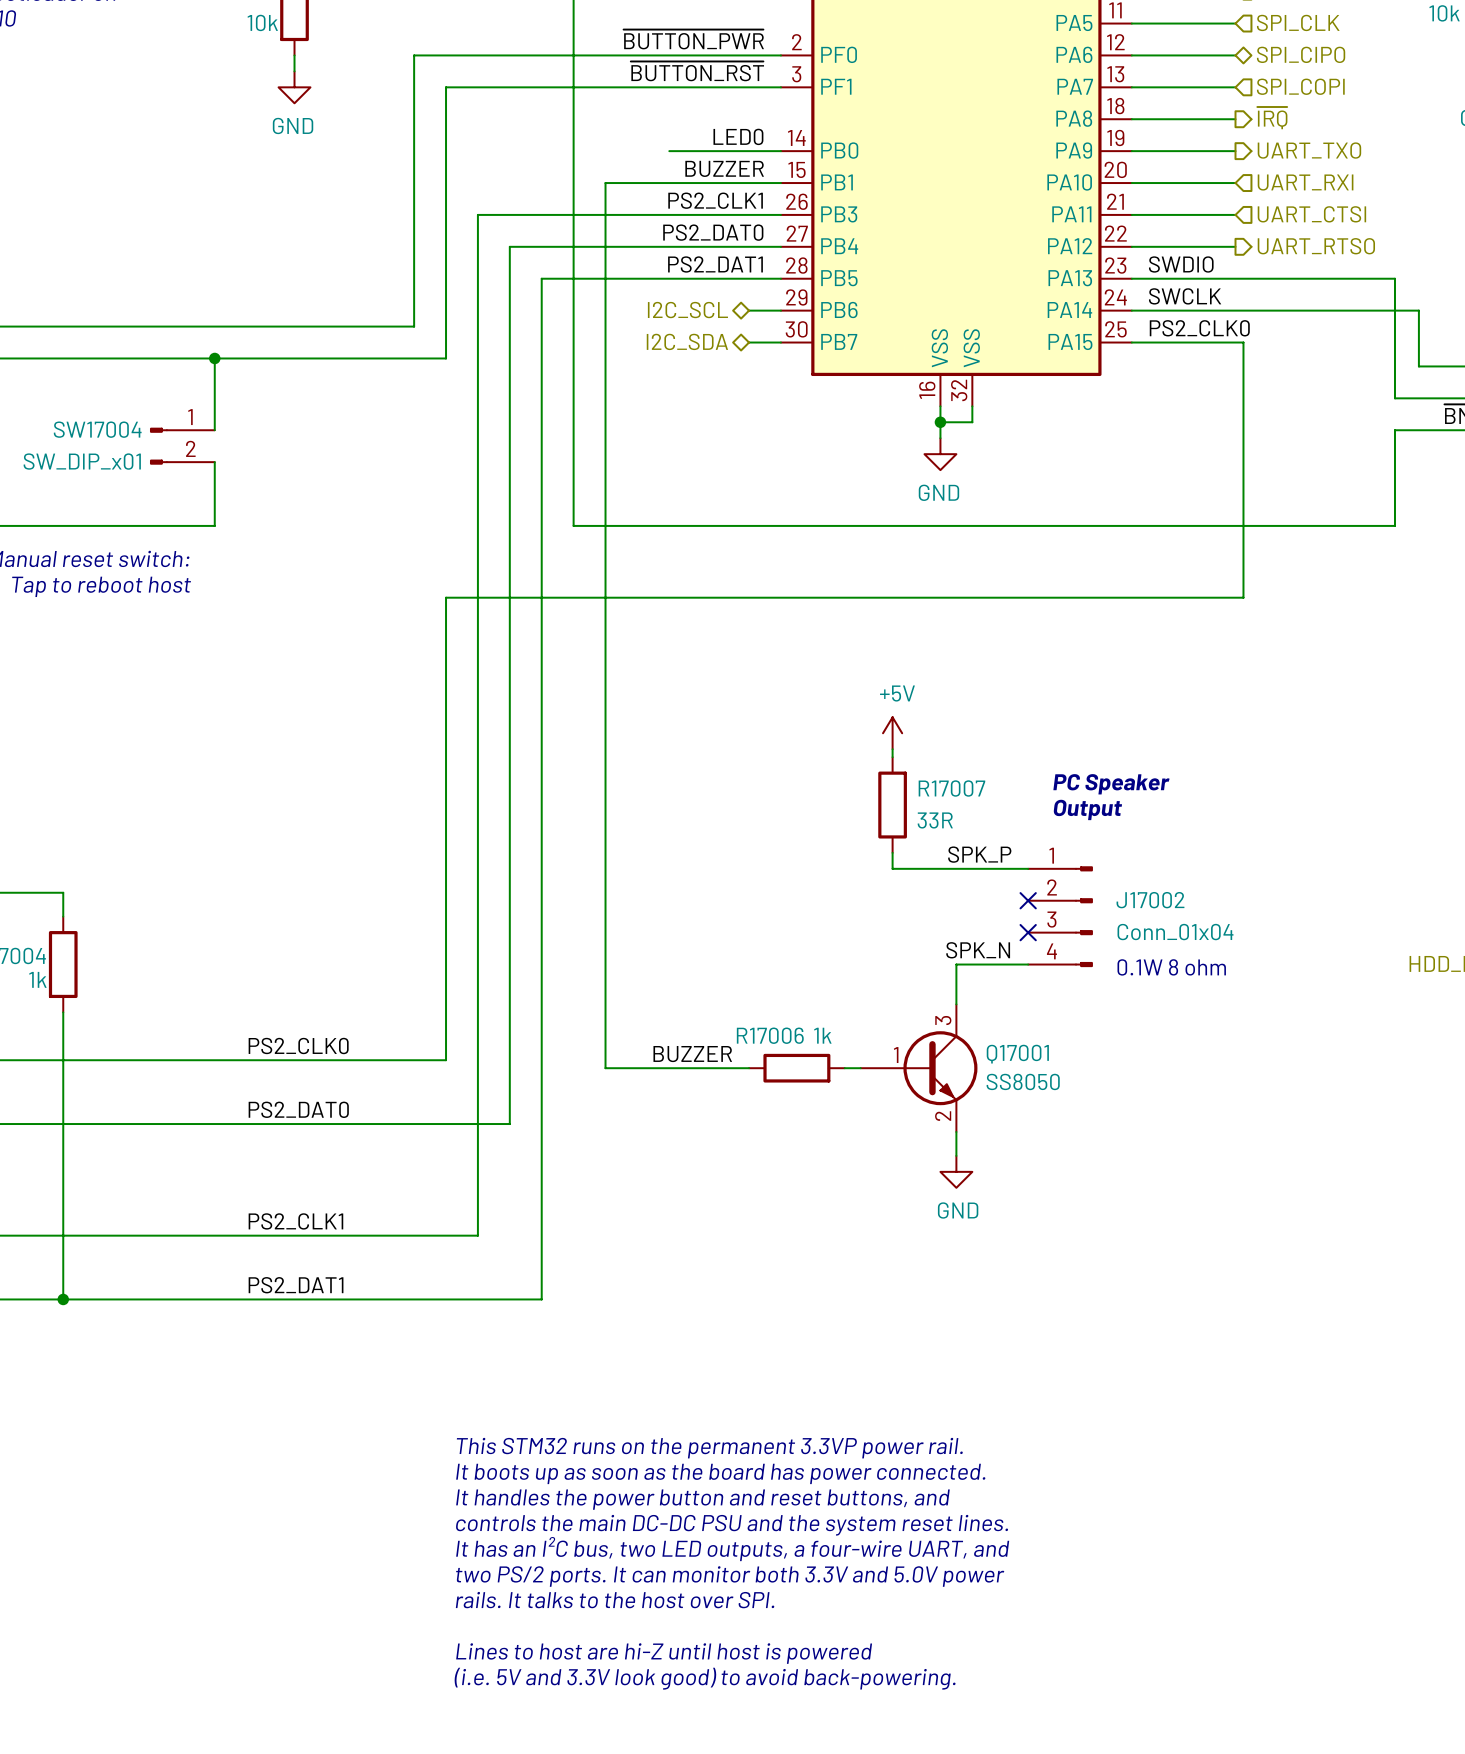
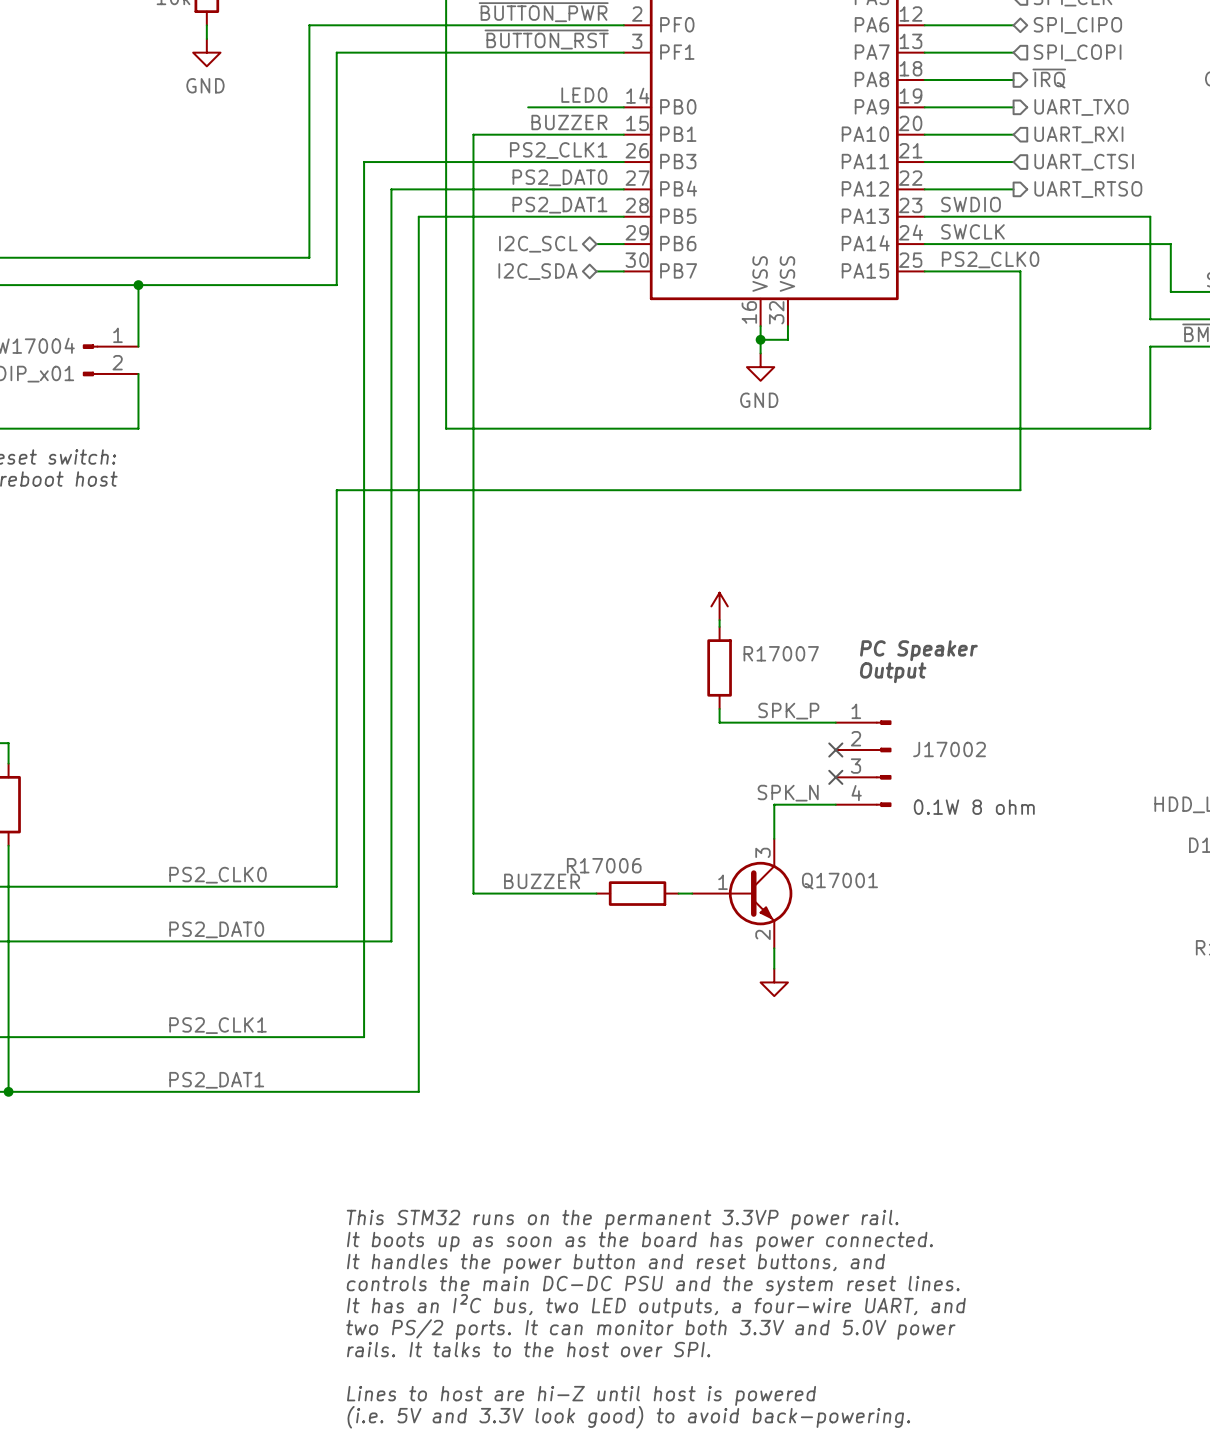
power symbol text: +5V (897, 693) -> none
R17007 value: 33R (935, 820) -> none
J17002 value: Conn_01x04 (1175, 932) -> none
R17006 value: 1k (822, 1035) -> none
Q17001 value: SS8050 (1023, 1081) -> none
power symbol text: GND (958, 1210) -> none

